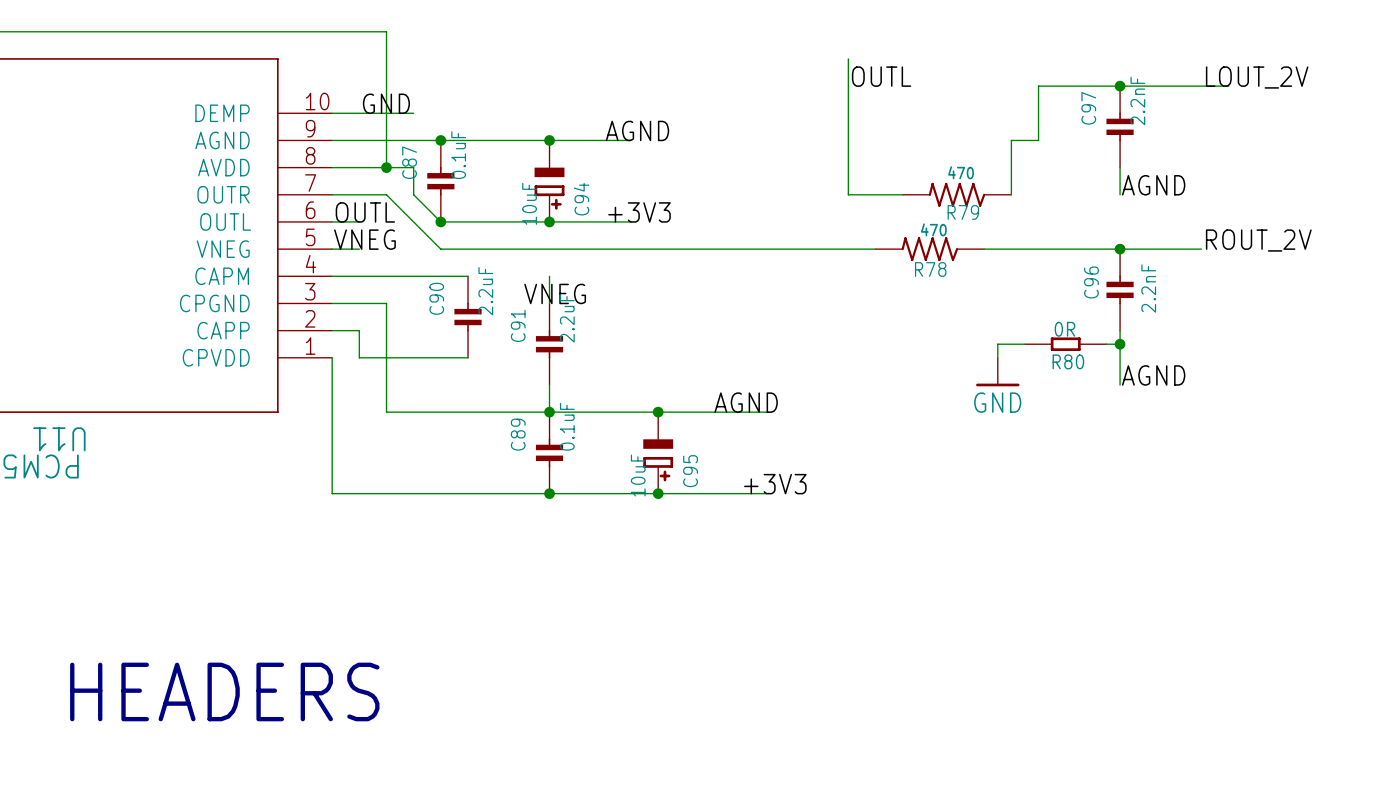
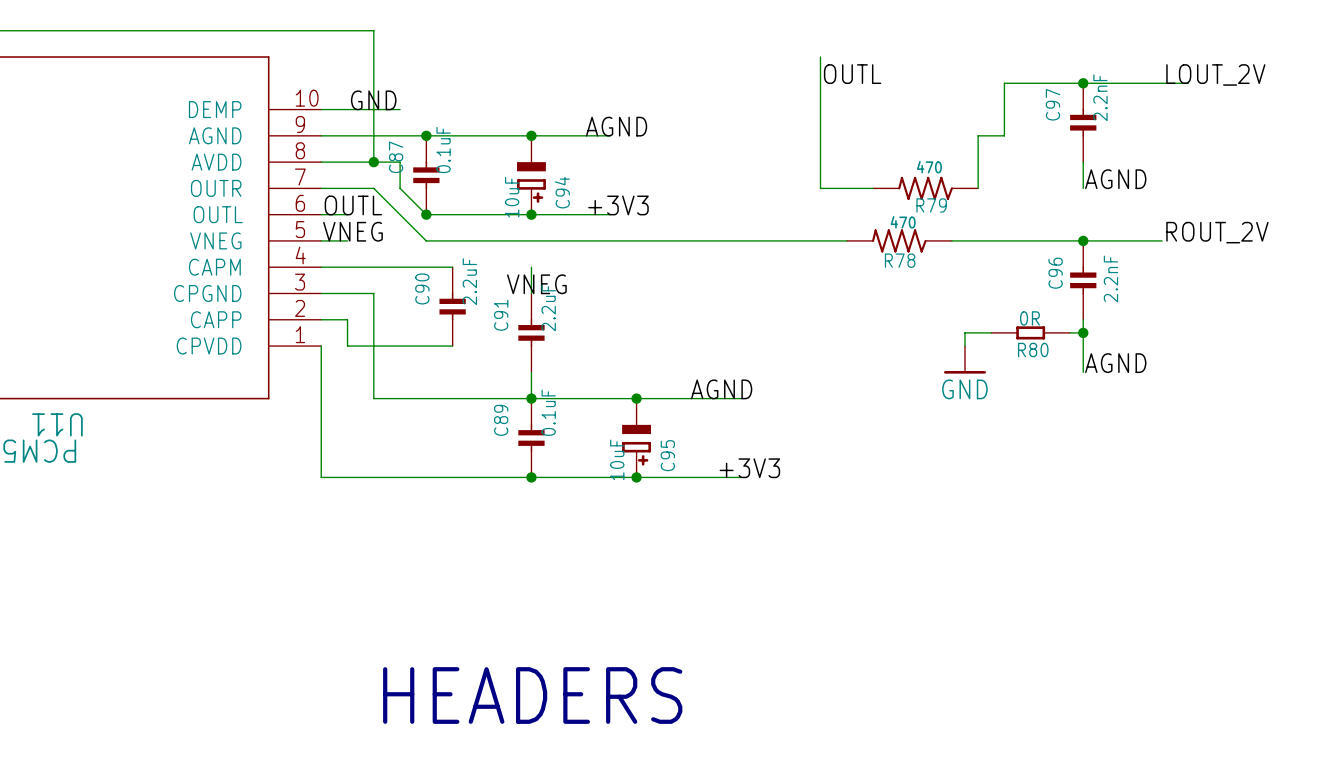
text: HEADERS (224, 691) -> none
text: none -> HEADERS (532, 695)

